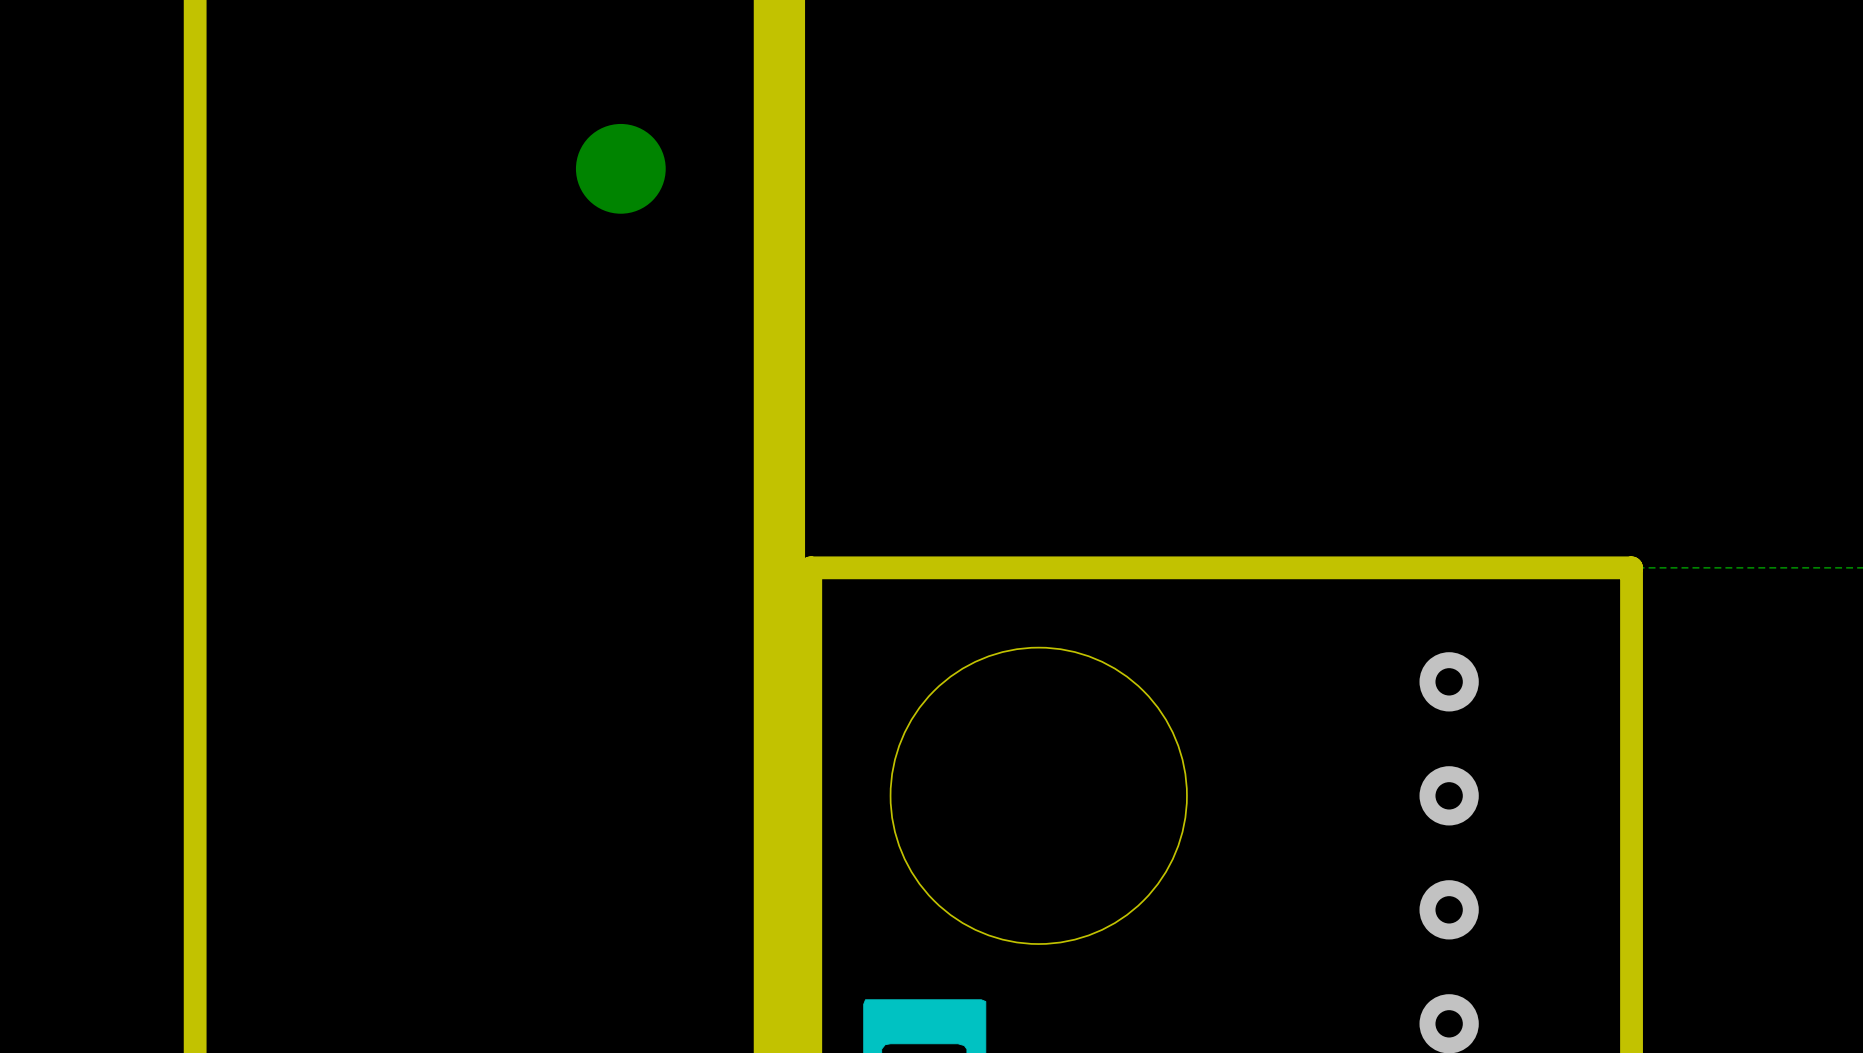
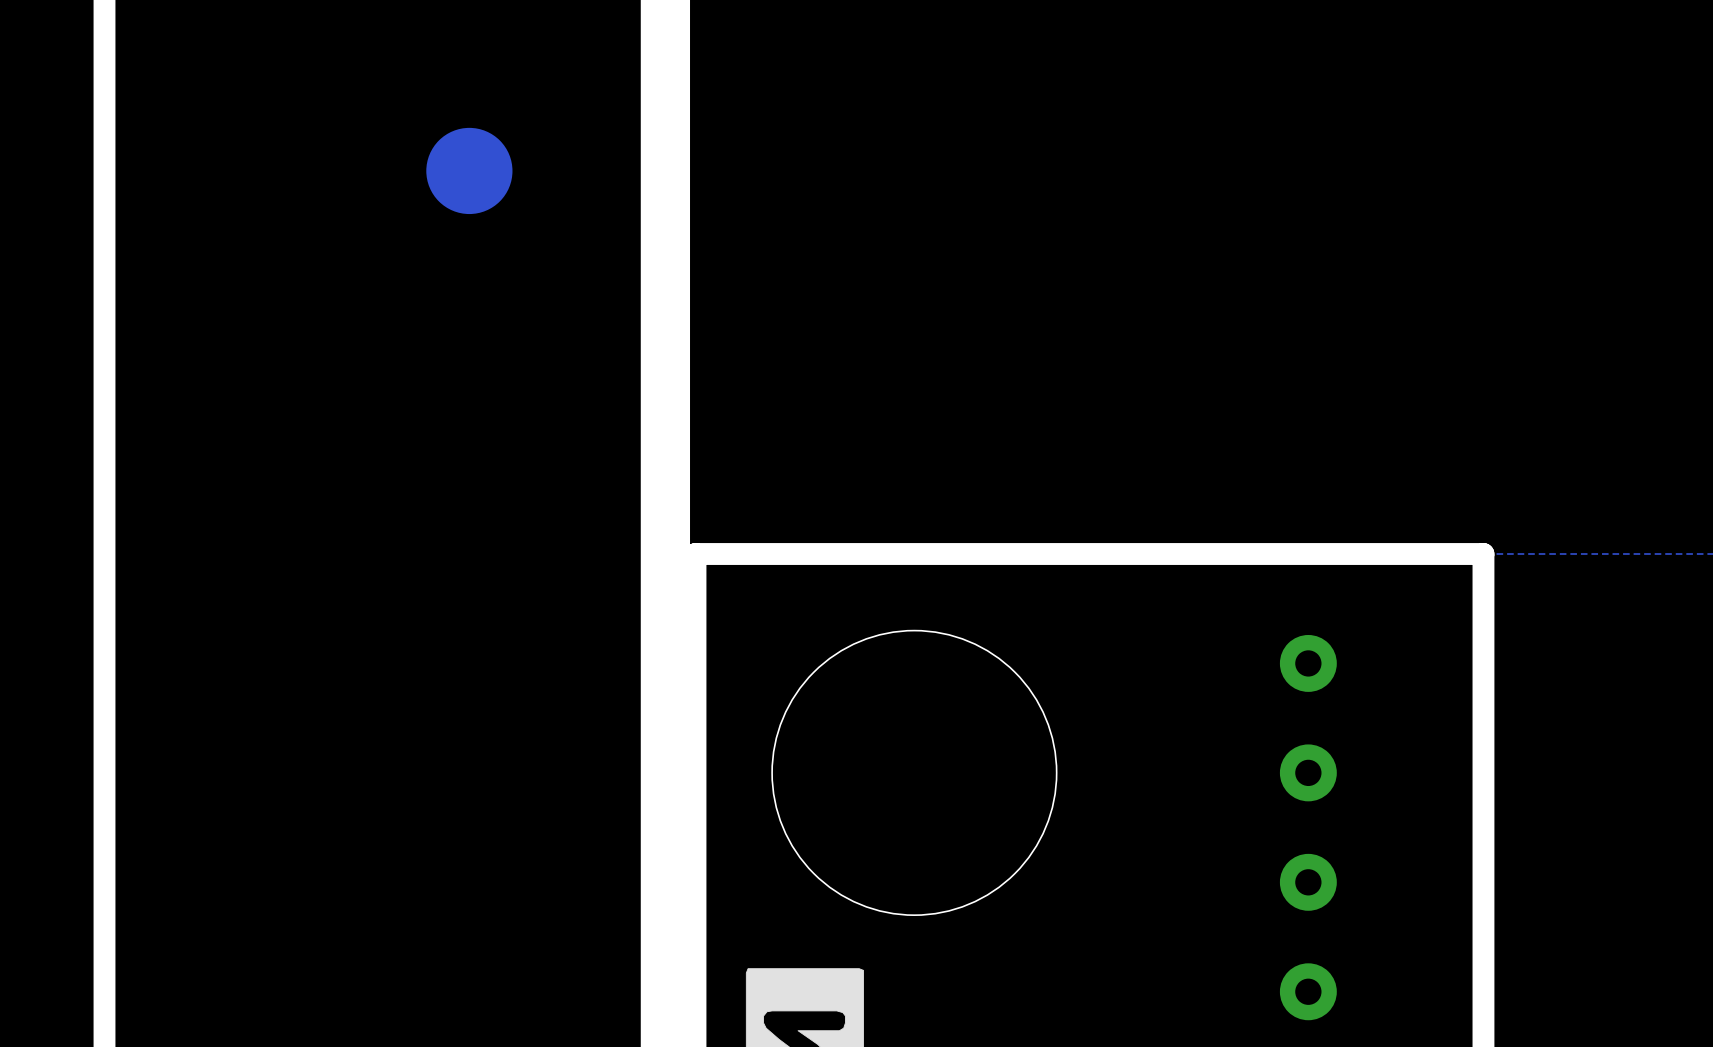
part position: (620, 168) -> (469, 170)

